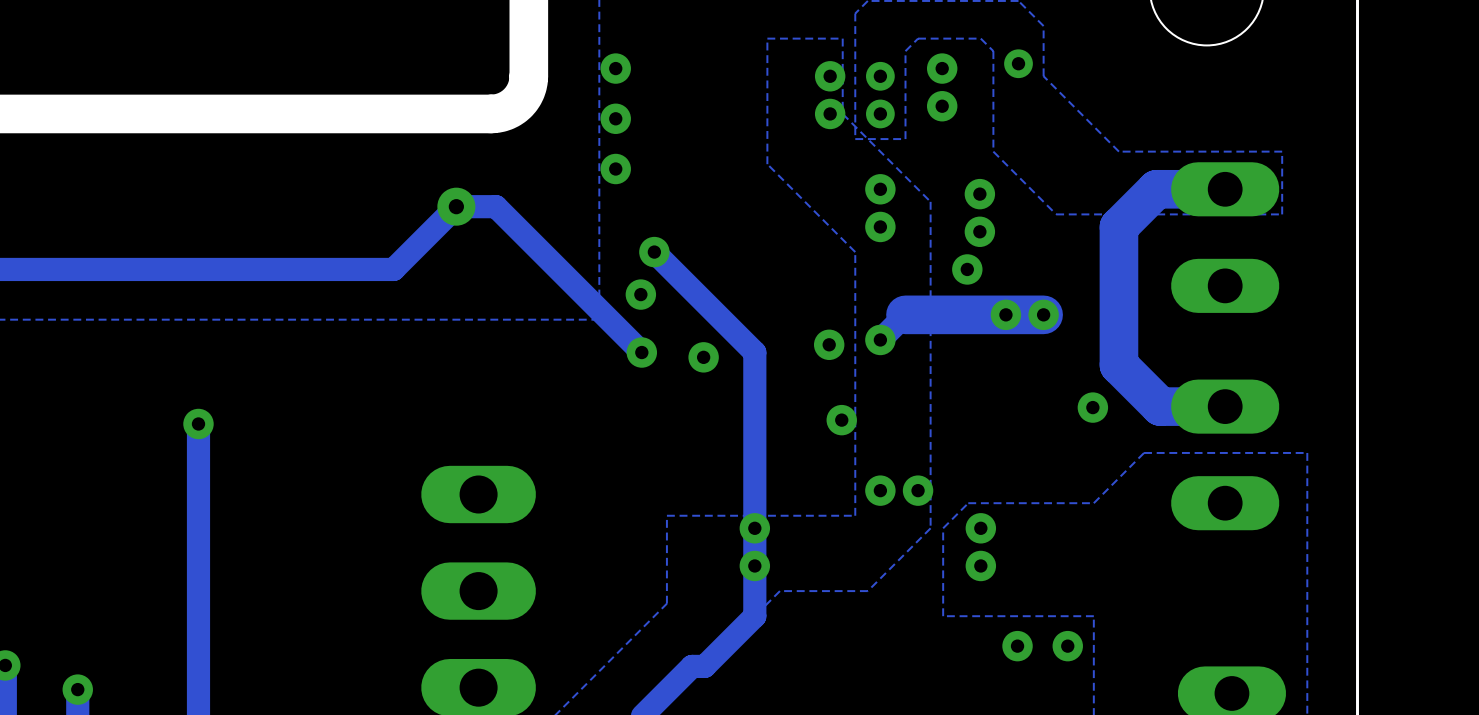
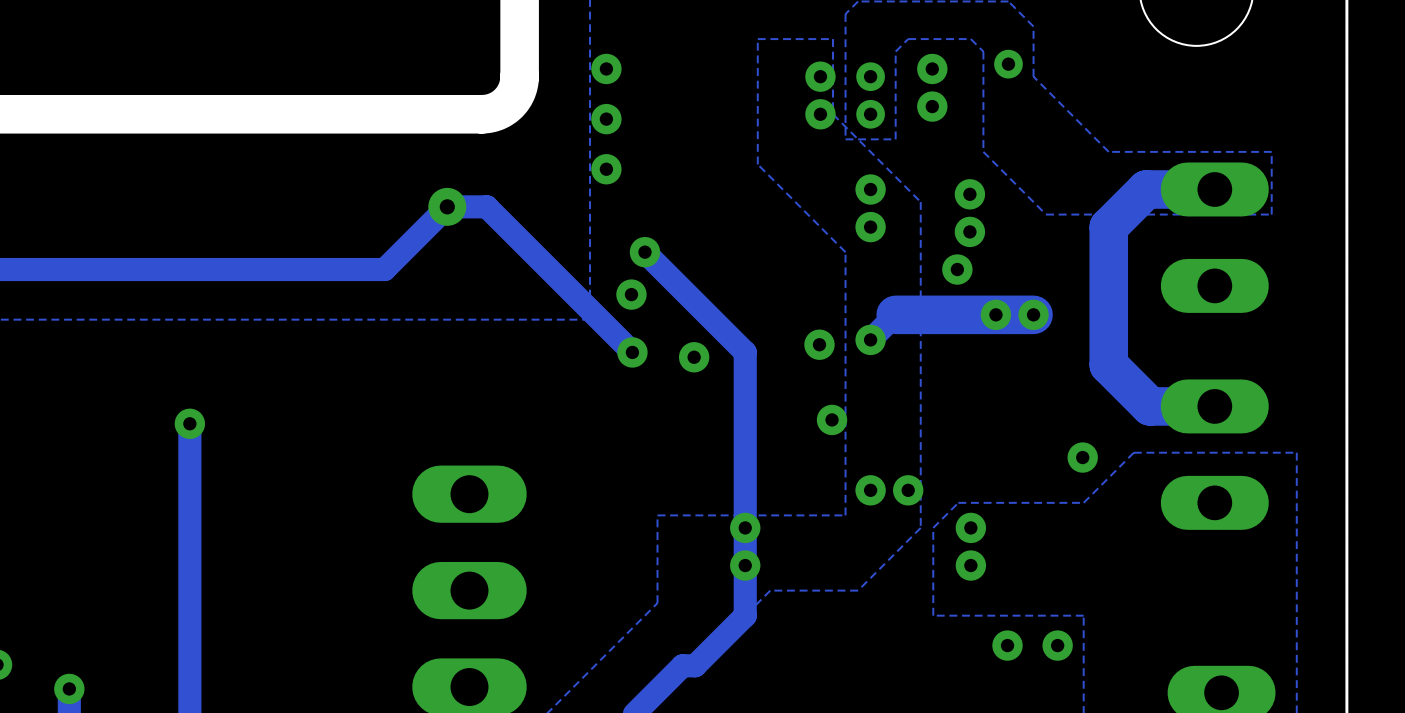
via position: (1092, 407) -> (1082, 457)

